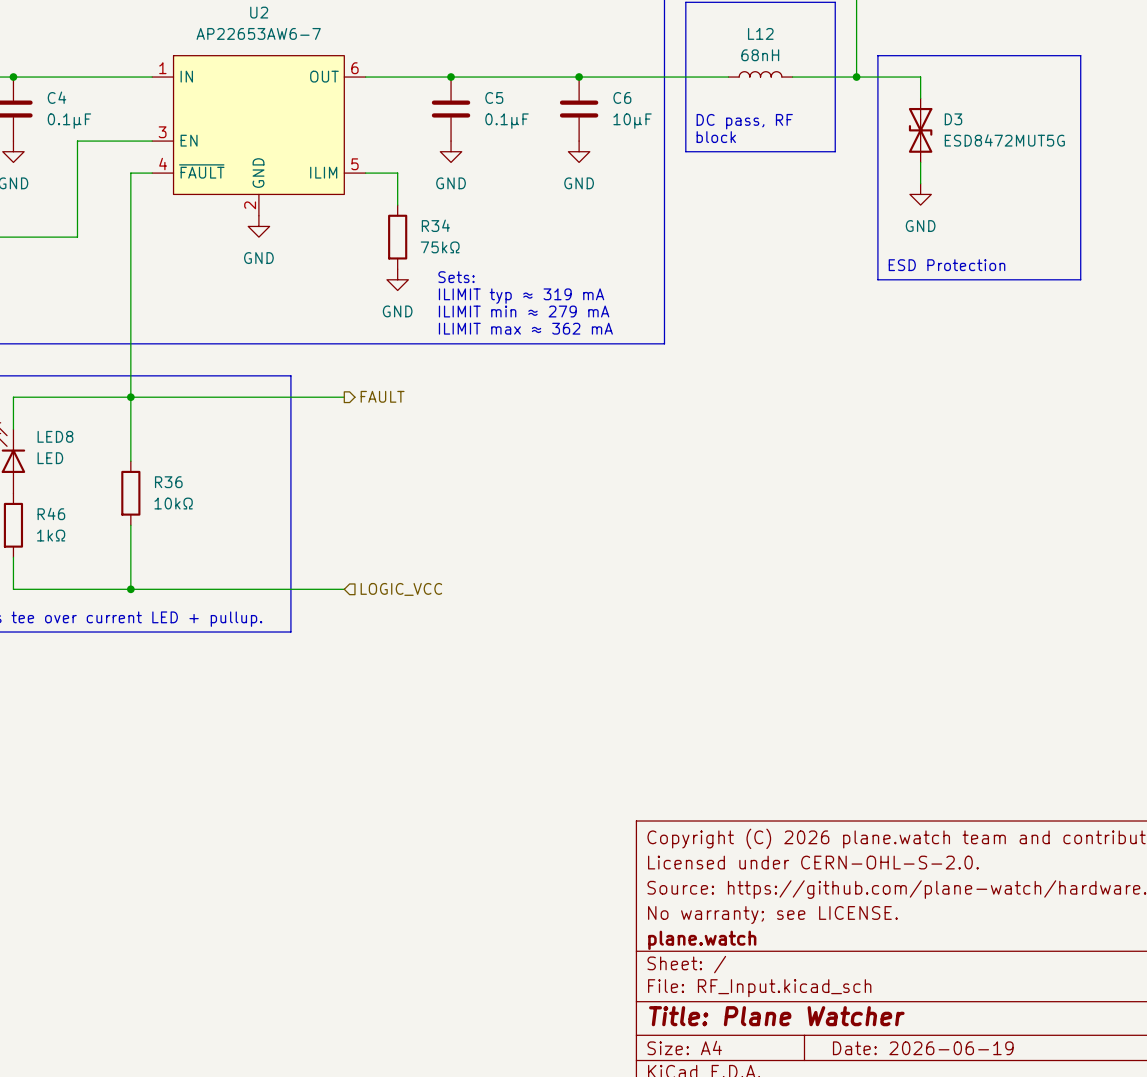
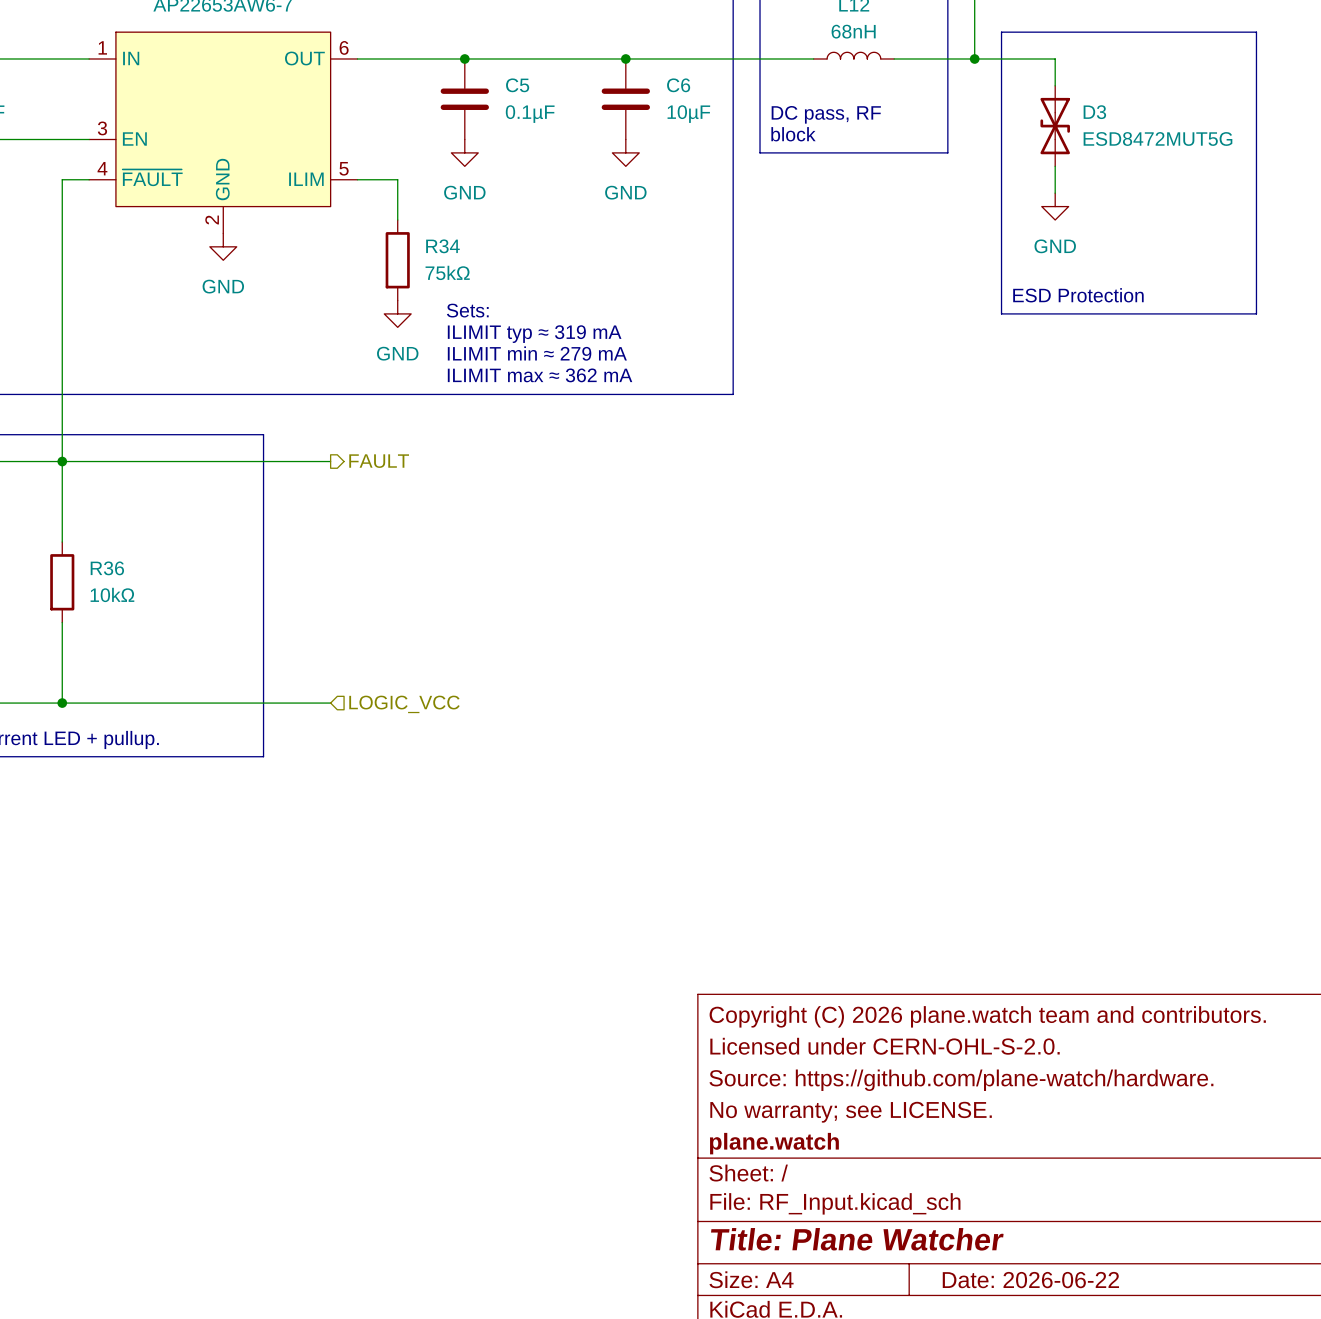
title block: Date: 2026-06-19 (923, 1048) -> Date: 2026-06-22 (1030, 1280)

